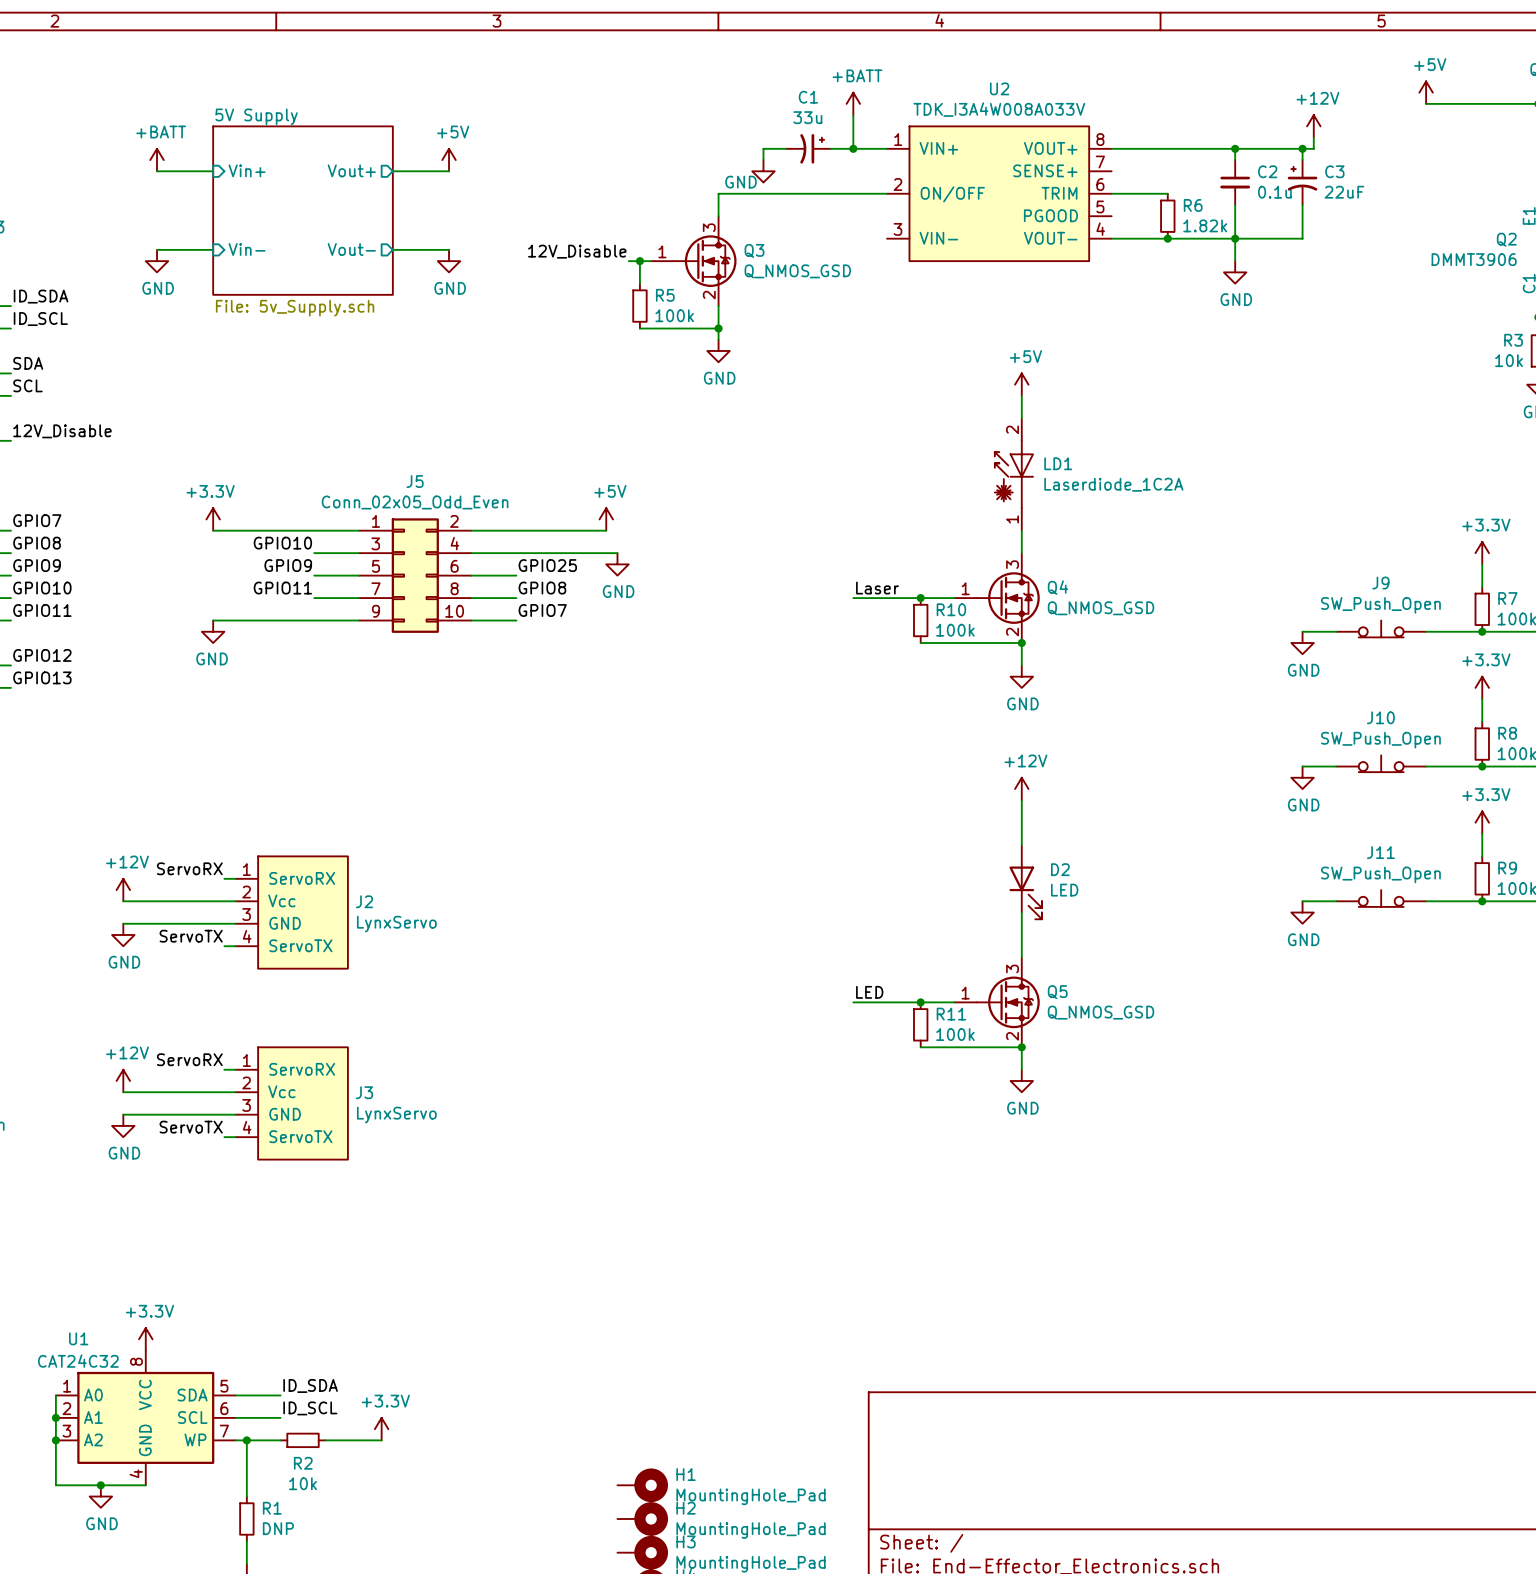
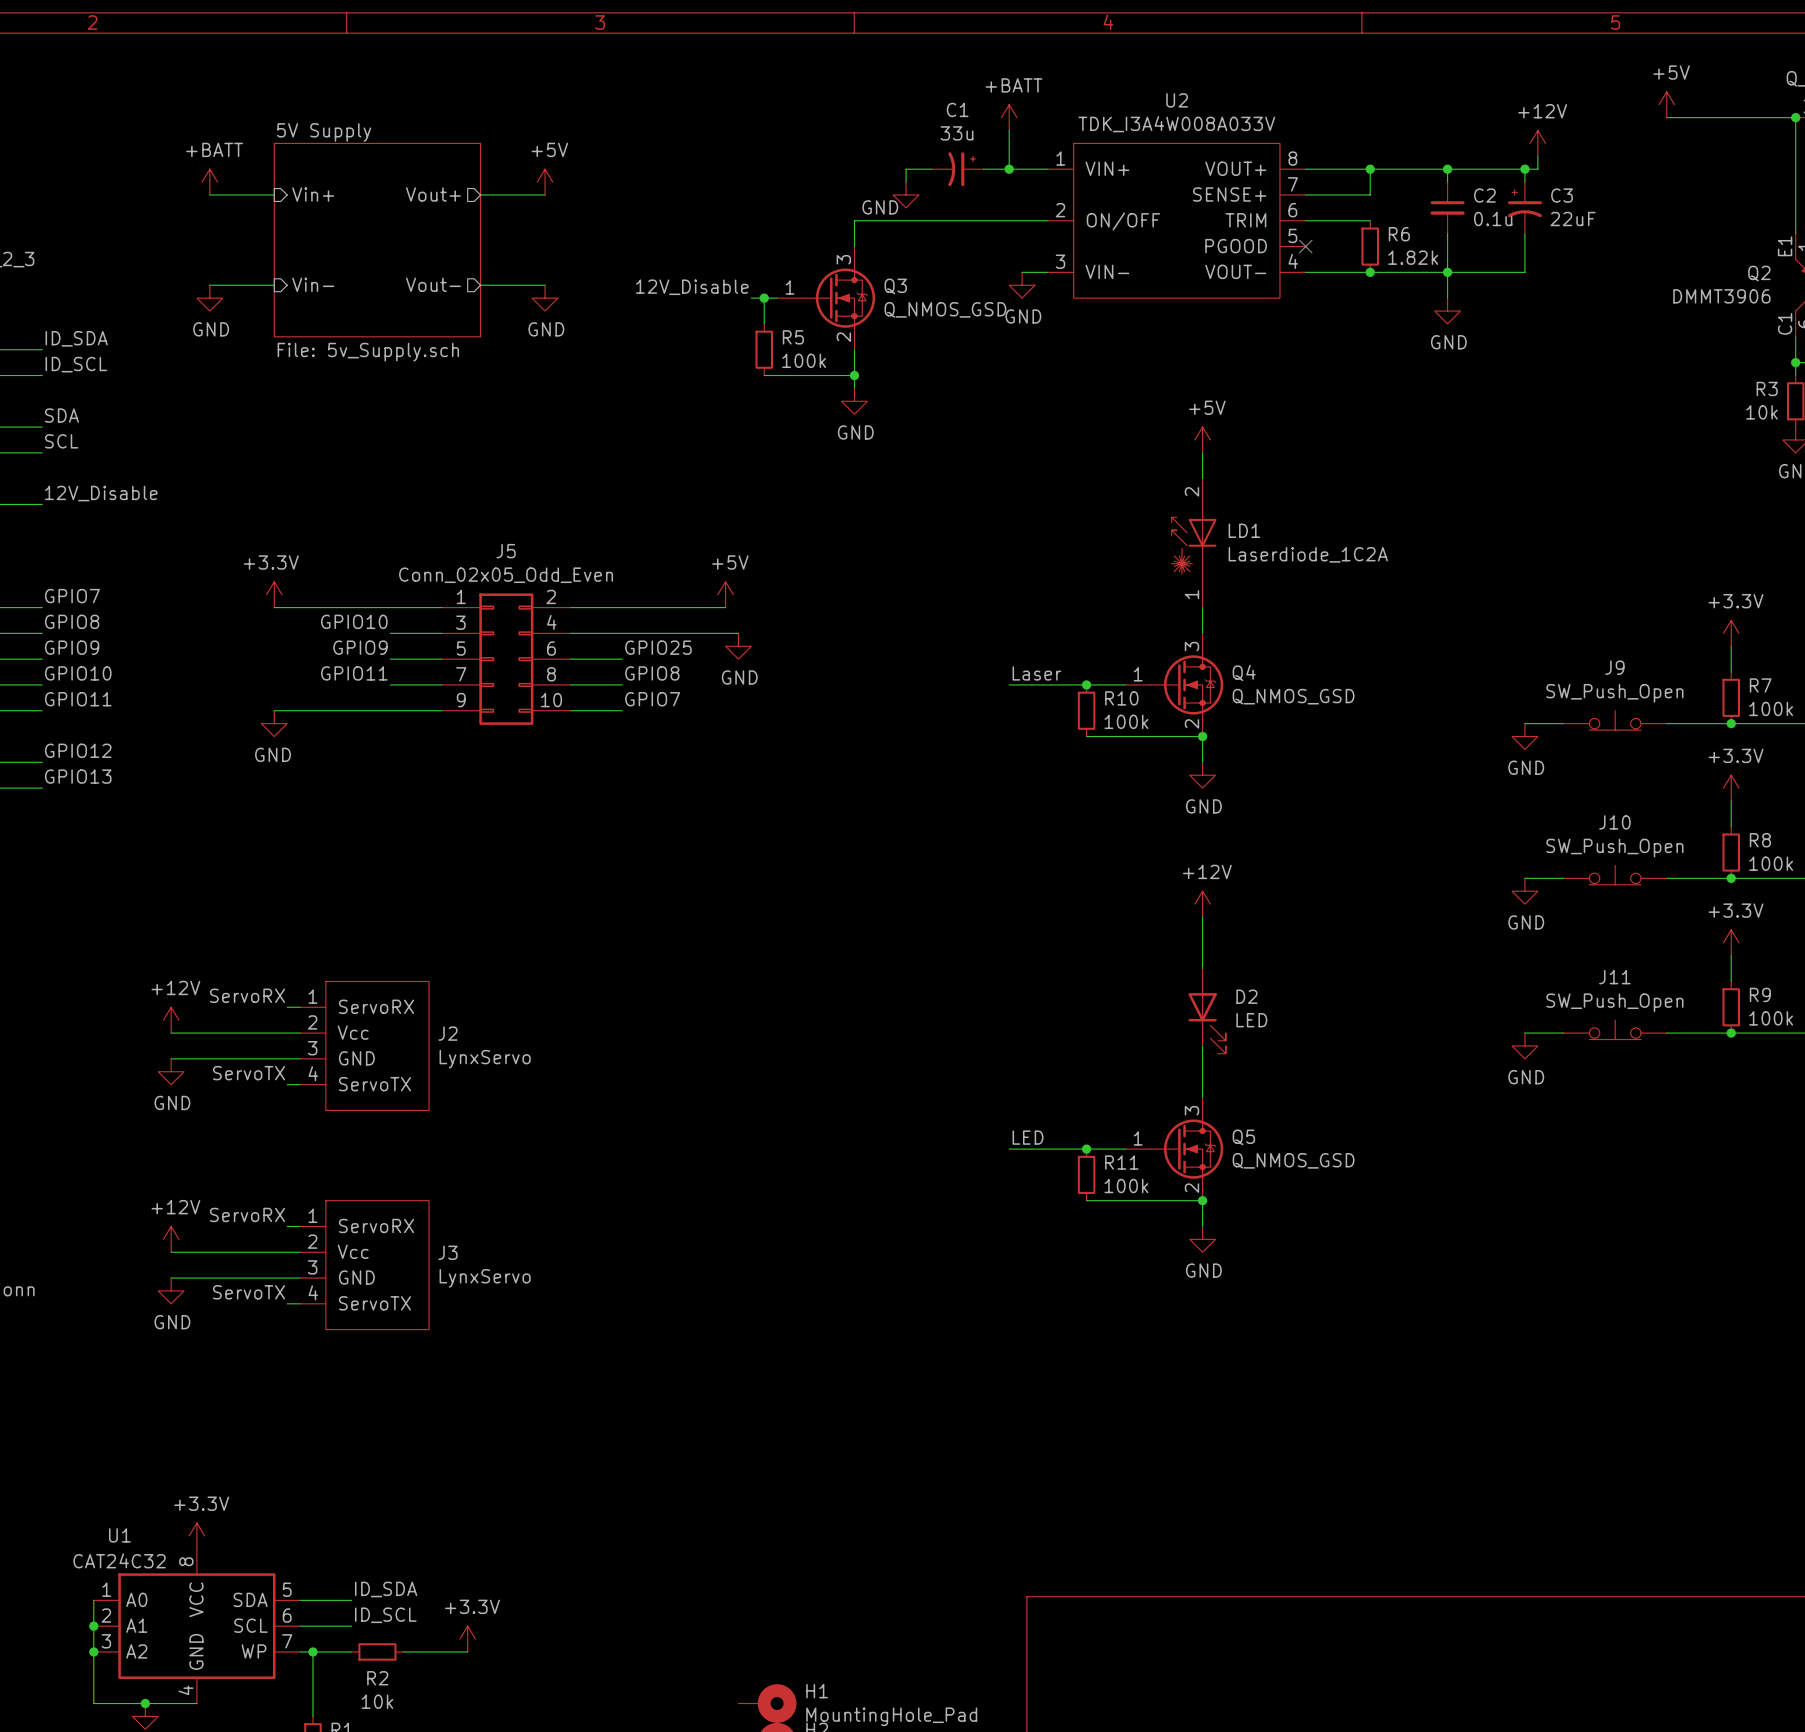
wire: none -> (1370, 169) (1370, 194) (1305, 194)
junction: none -> (1370, 169)
no-connect mark: none -> (1305, 246)
wire: none -> (1022, 272) (1047, 272)
power symbol: none -> GND (1022, 285)

